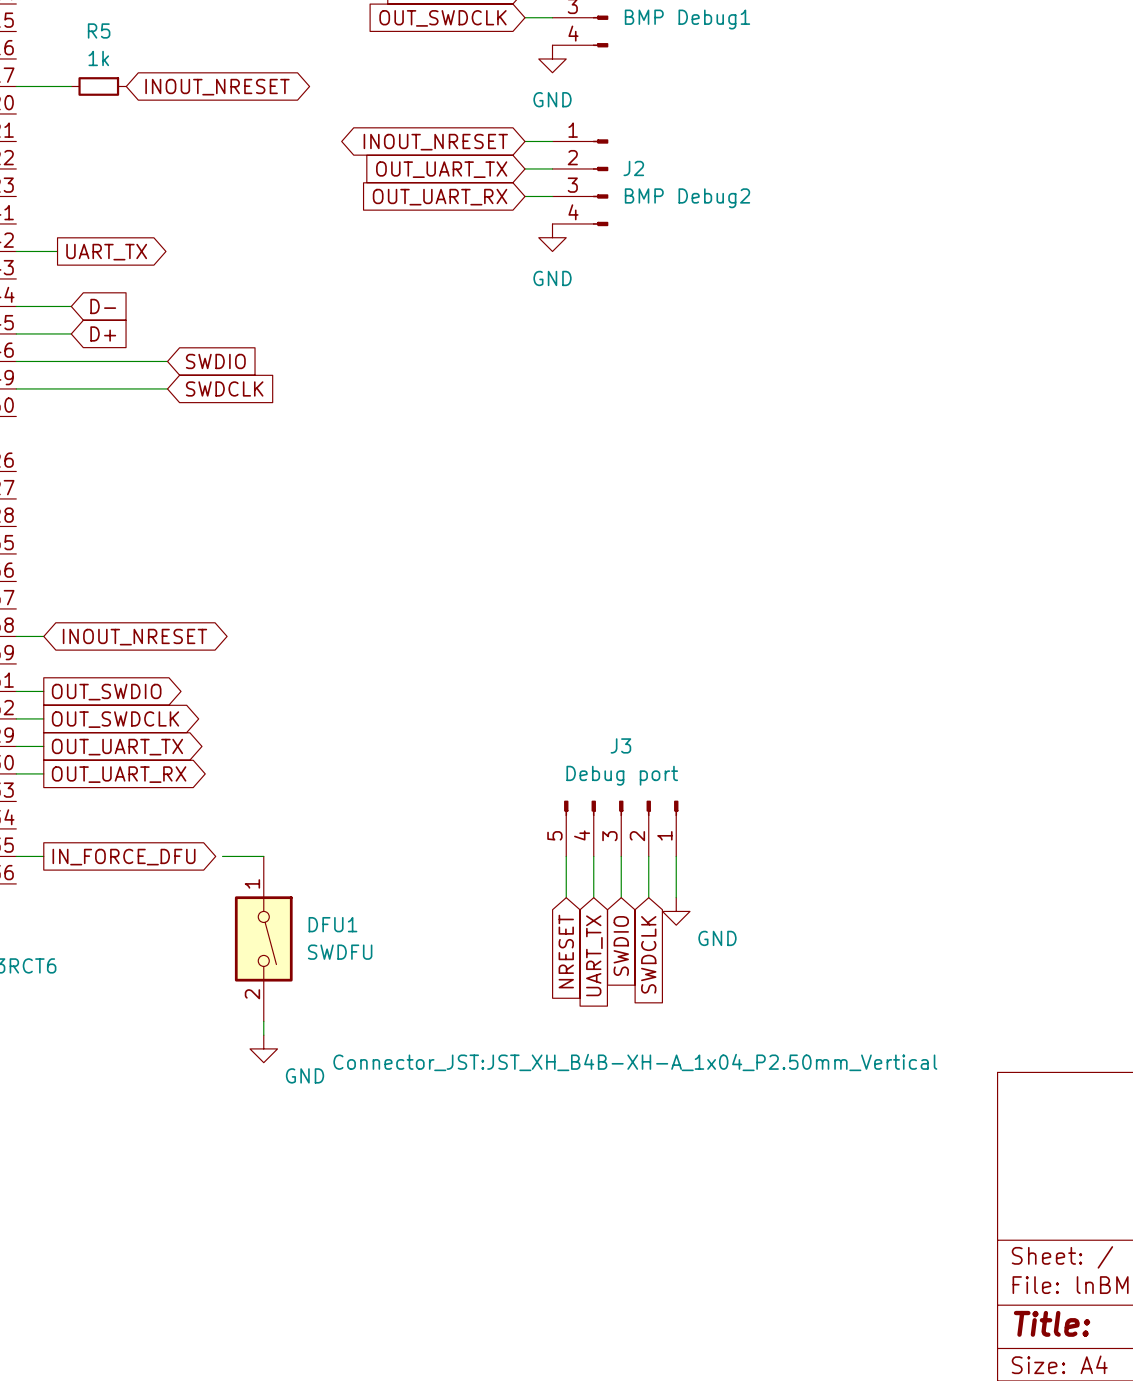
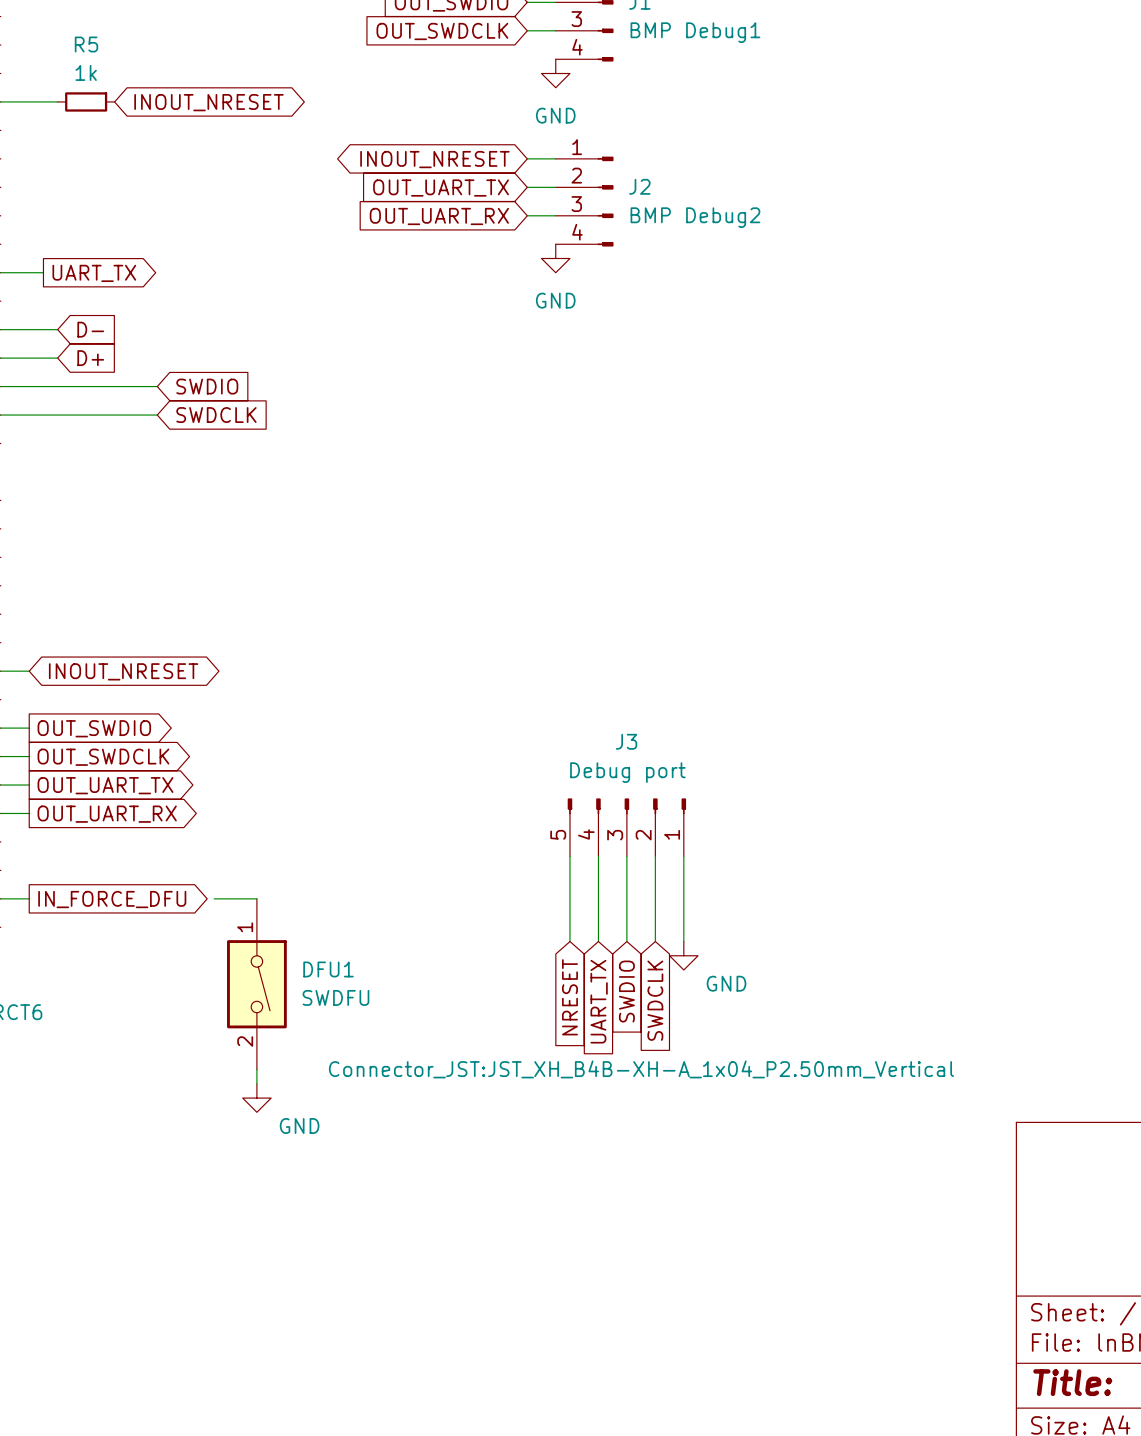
J3 position: (621, 828) -> (626, 827)

